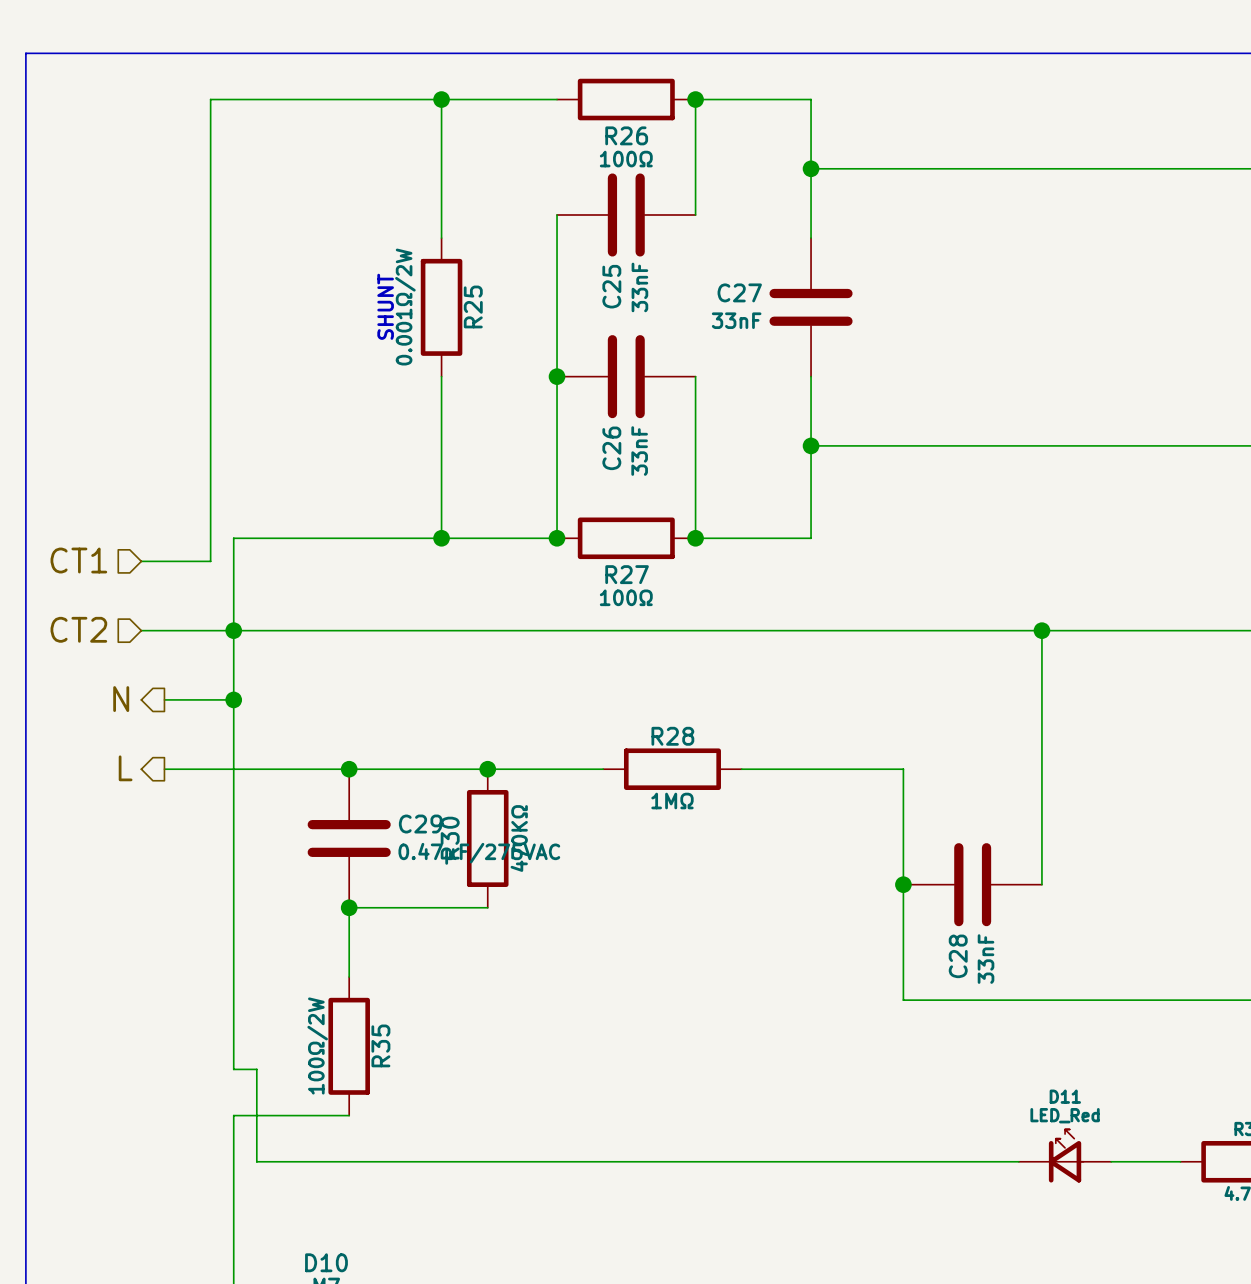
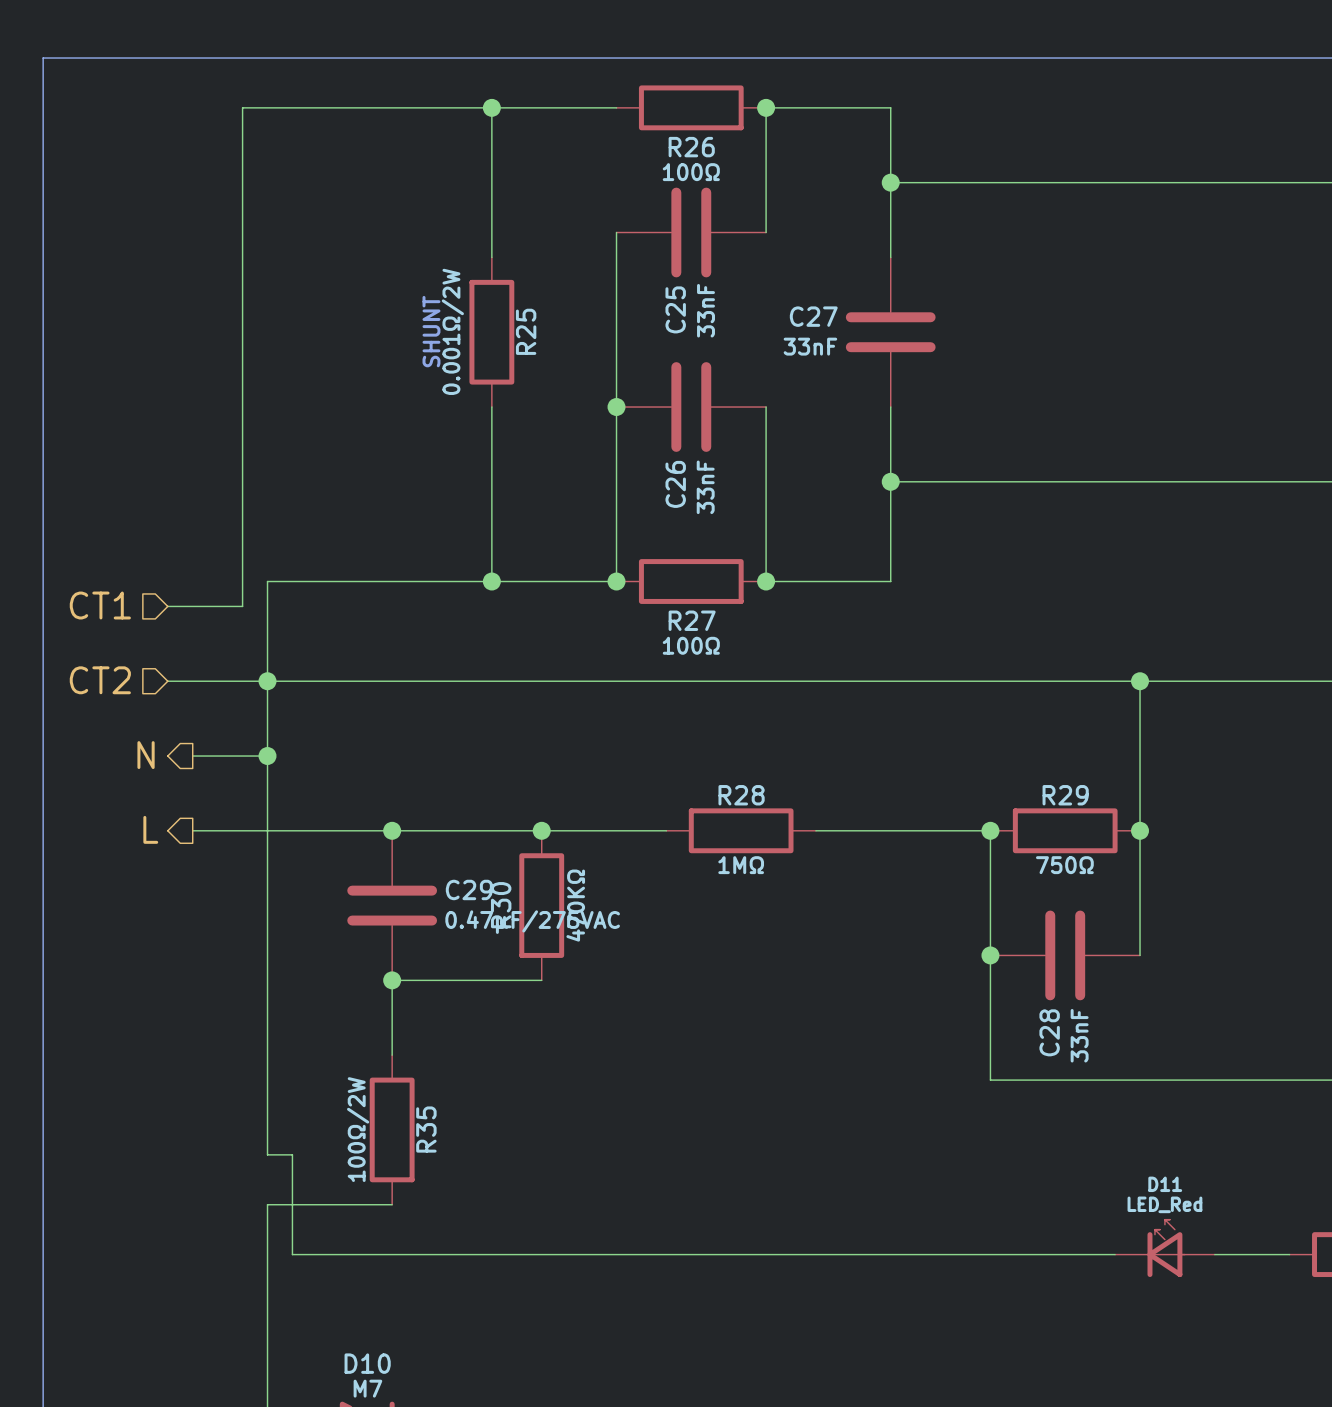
junction: none -> (990, 830)
R29: none -> 750Ω (1065, 830)
junction: none -> (1140, 830)

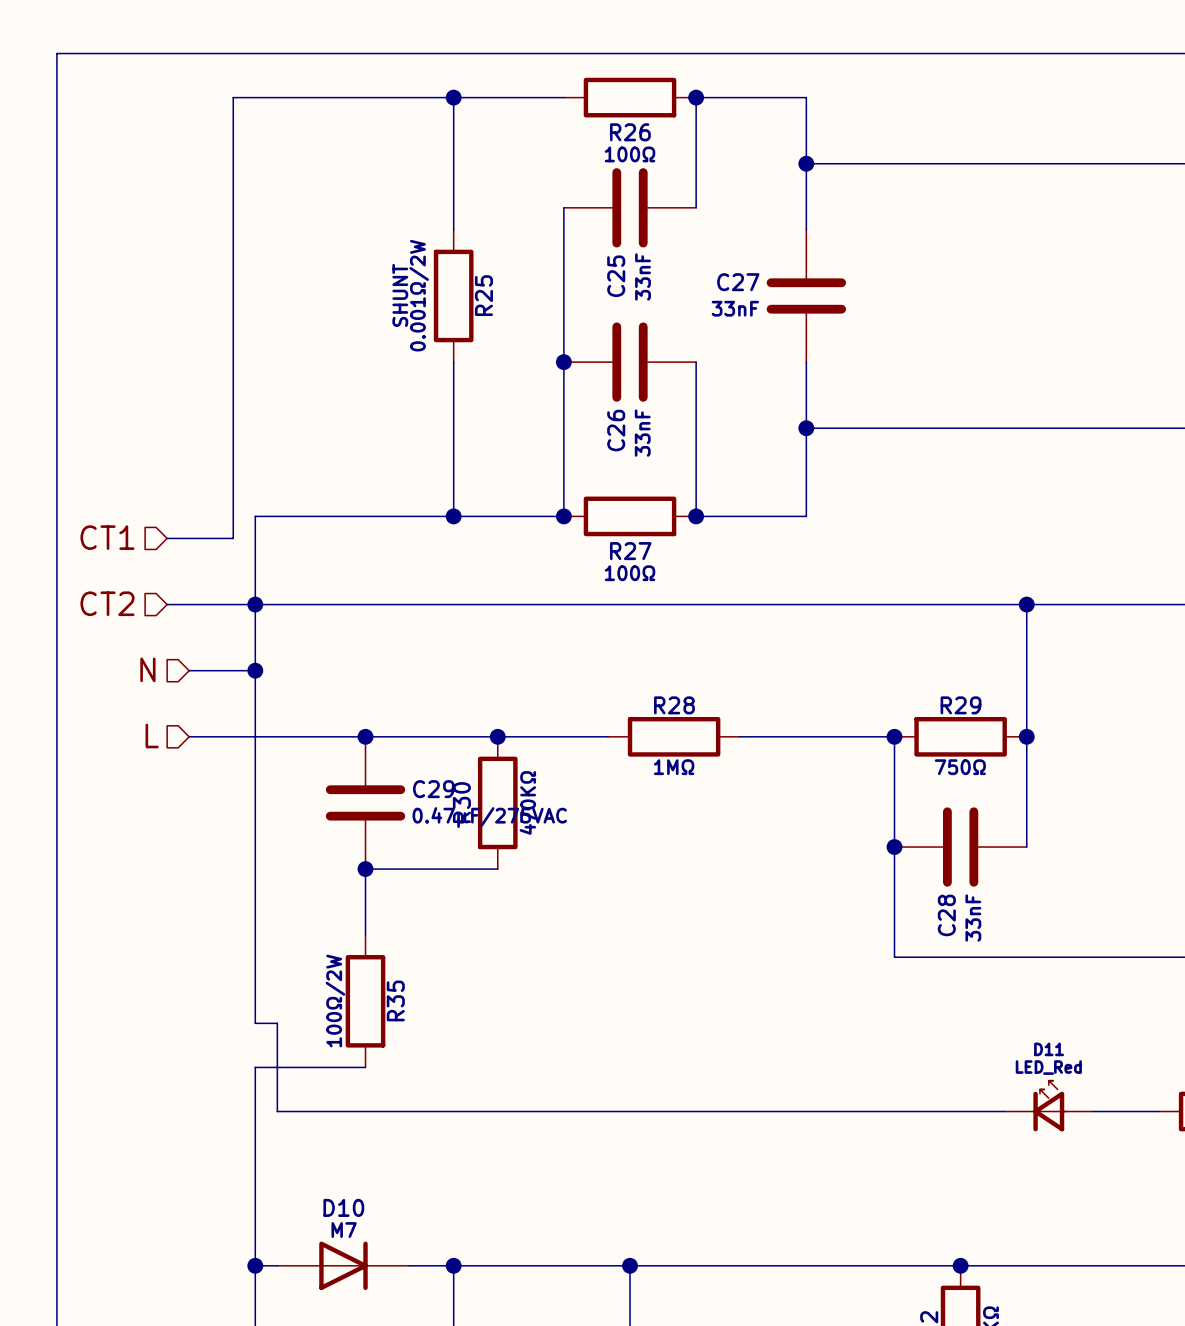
hierarchical label shape: output (146, 755) -> input (147, 669)
hierarchical label shape: output (150, 829) -> input (152, 735)

